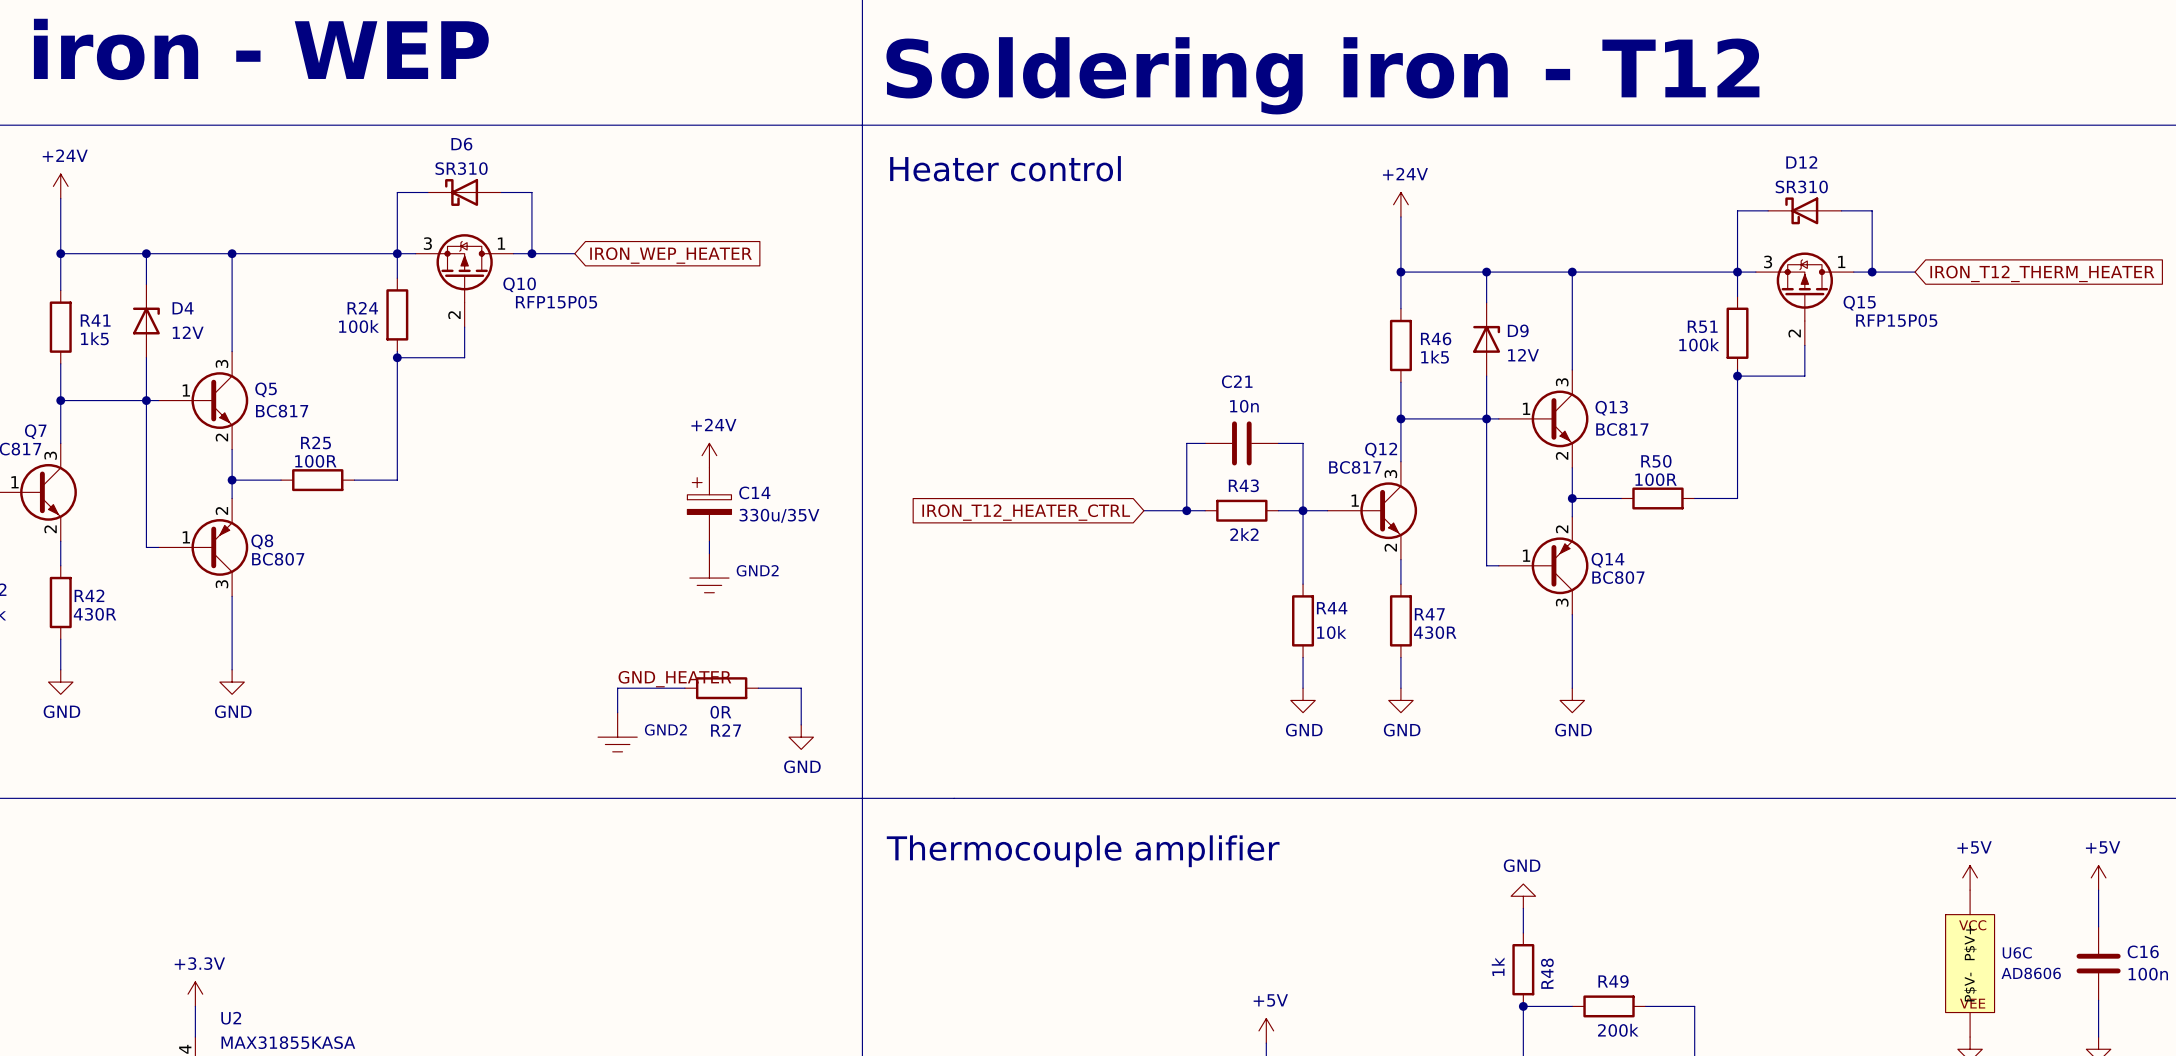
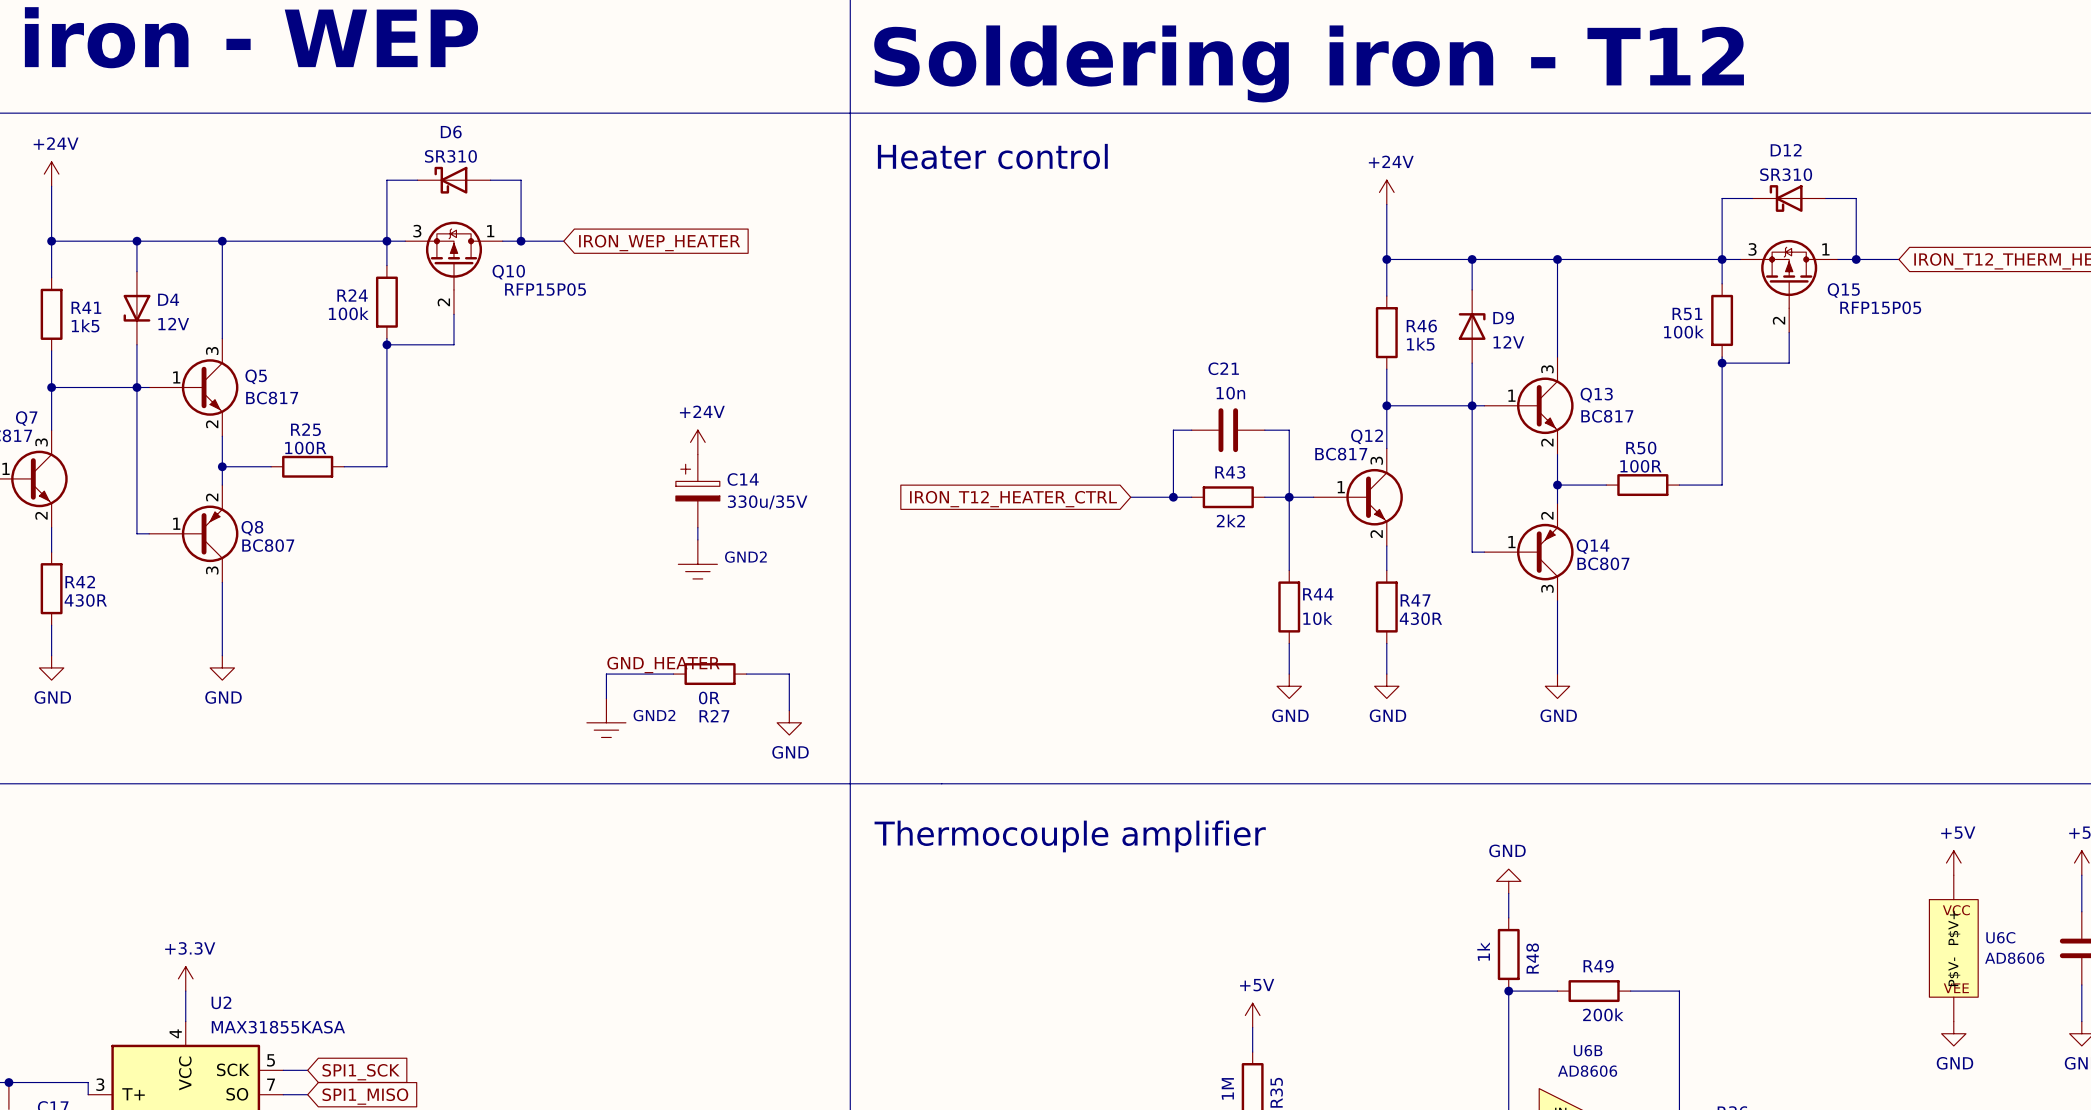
D4 rotation: 0° (146, 321) -> 180° (136, 308)

